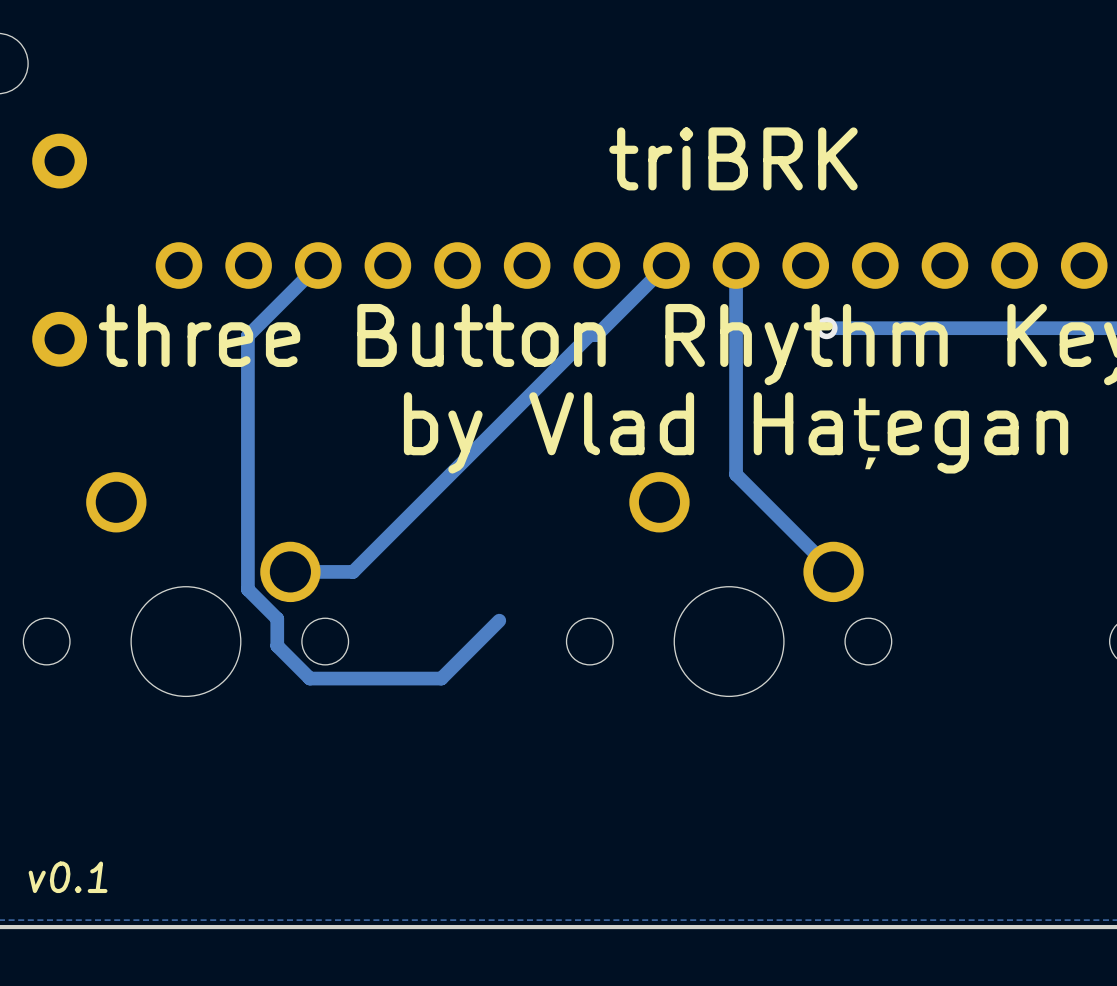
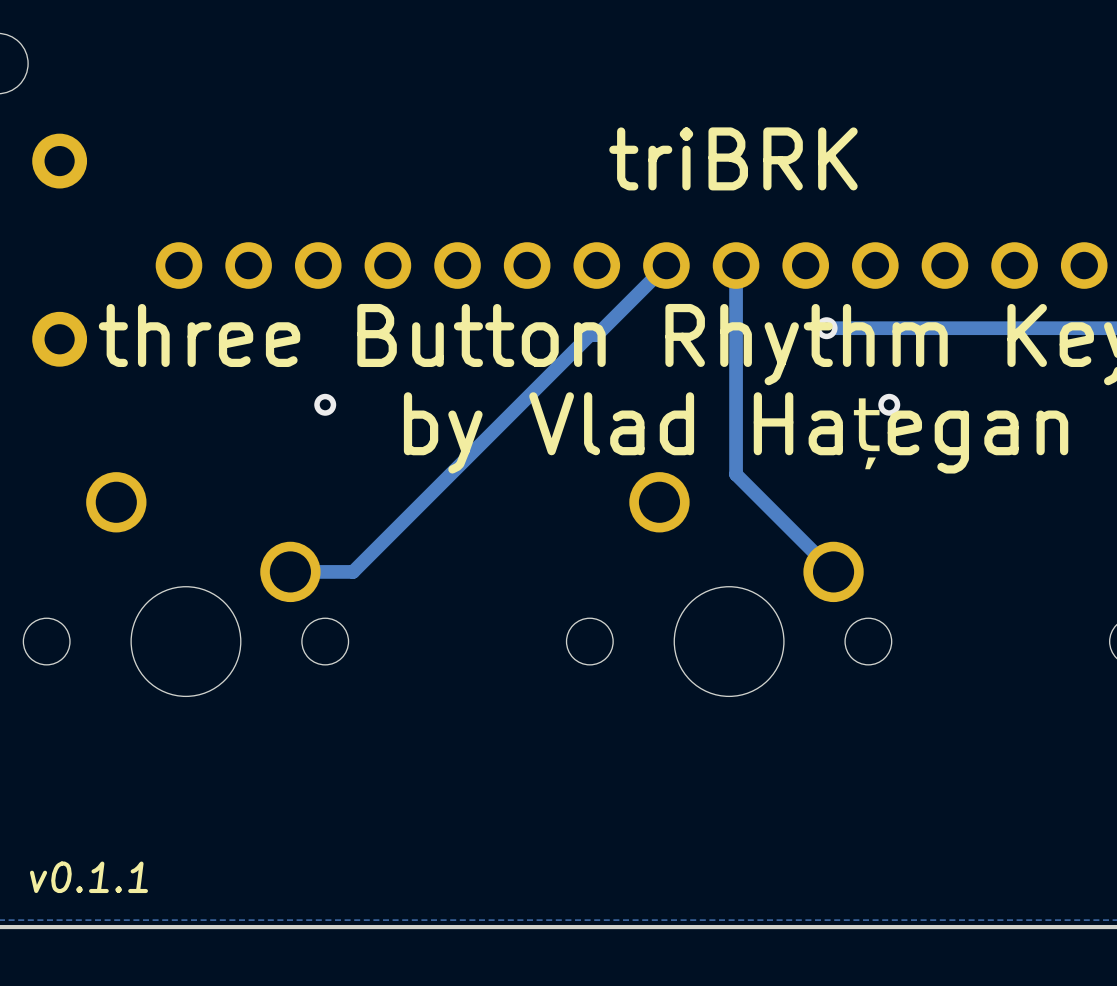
track: (318, 265) (247, 335) (247, 589) (277, 618) (277, 645) (309, 678) (441, 678) (499, 620) -> none
via: none -> (325, 404)
via: none -> (889, 404)
text: v0.1 (68, 877) -> v0.1.1 (88, 877)

